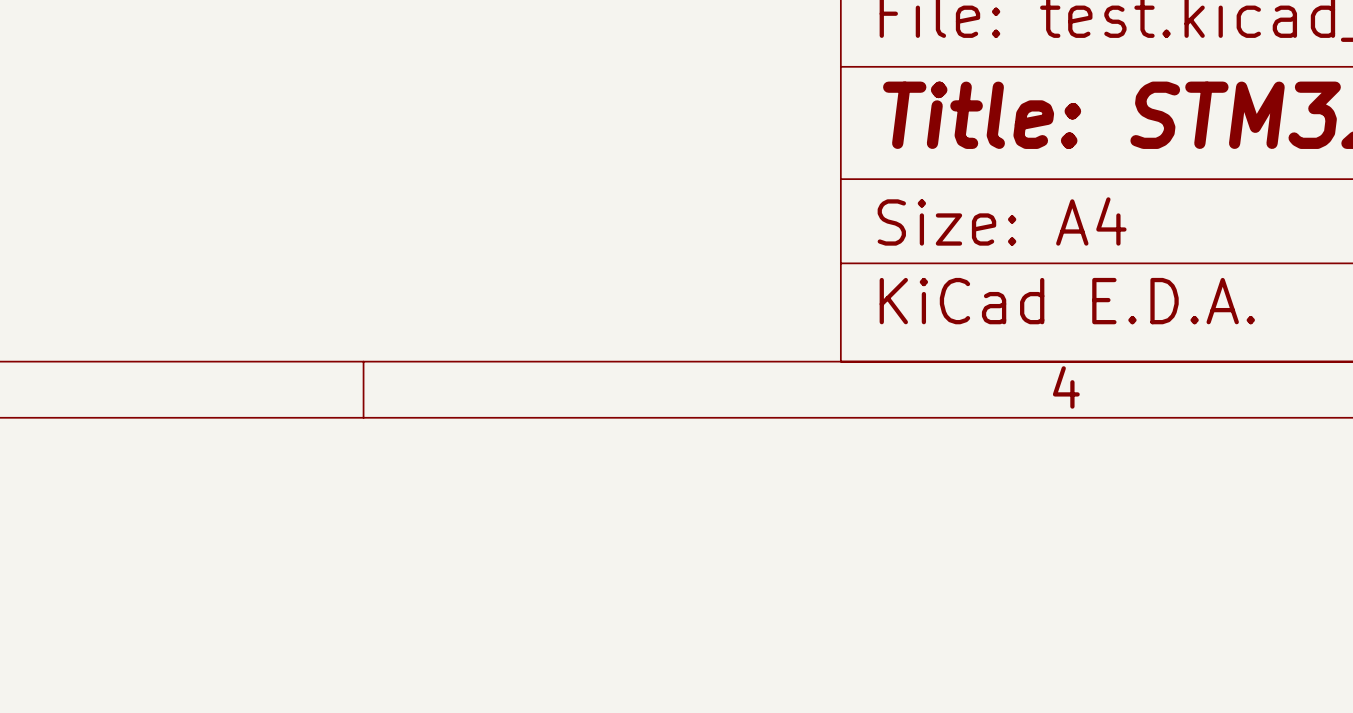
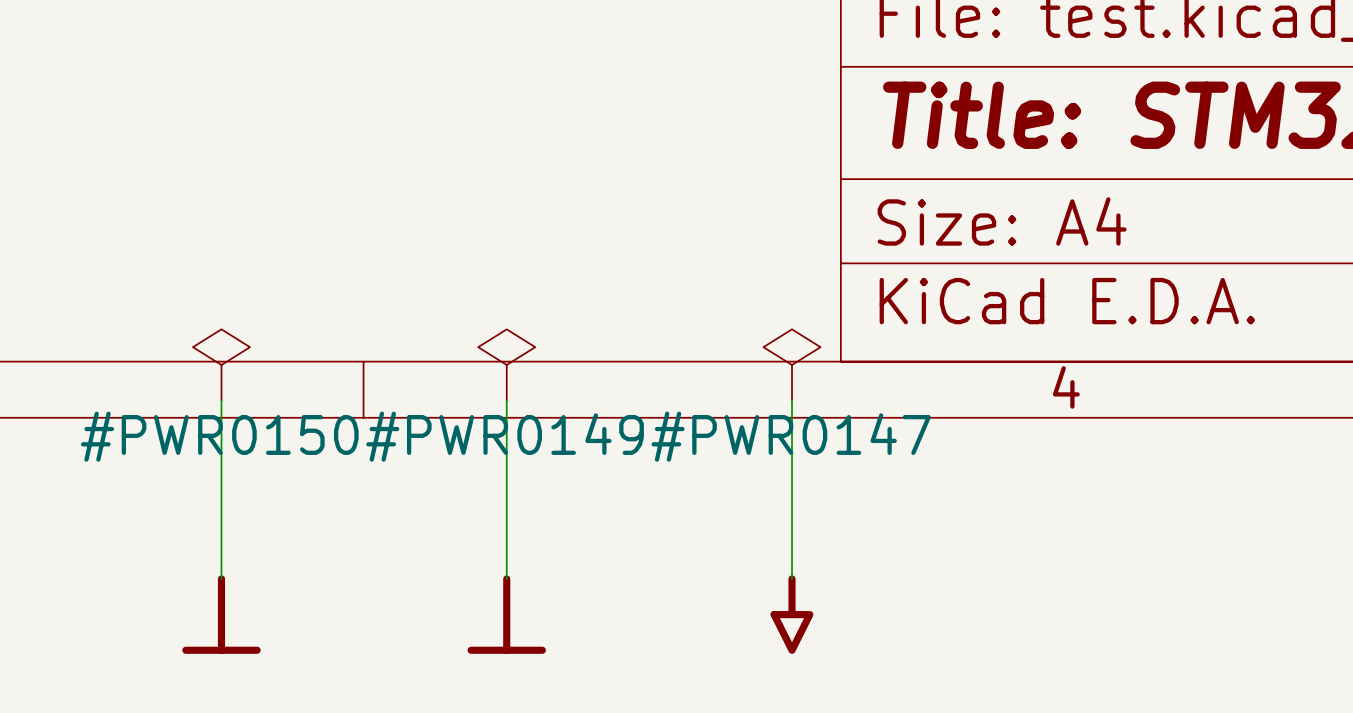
power symbol: none -> (221, 365)
power symbol: none -> (506, 365)
power symbol: none -> (792, 365)
wire: none -> (221, 400) (221, 578)
wire: none -> (506, 400) (506, 578)
wire: none -> (792, 400) (792, 578)
#PWR0150: none -> (221, 614)
#PWR0149: none -> (506, 614)
#PWR0147: none -> (792, 614)

